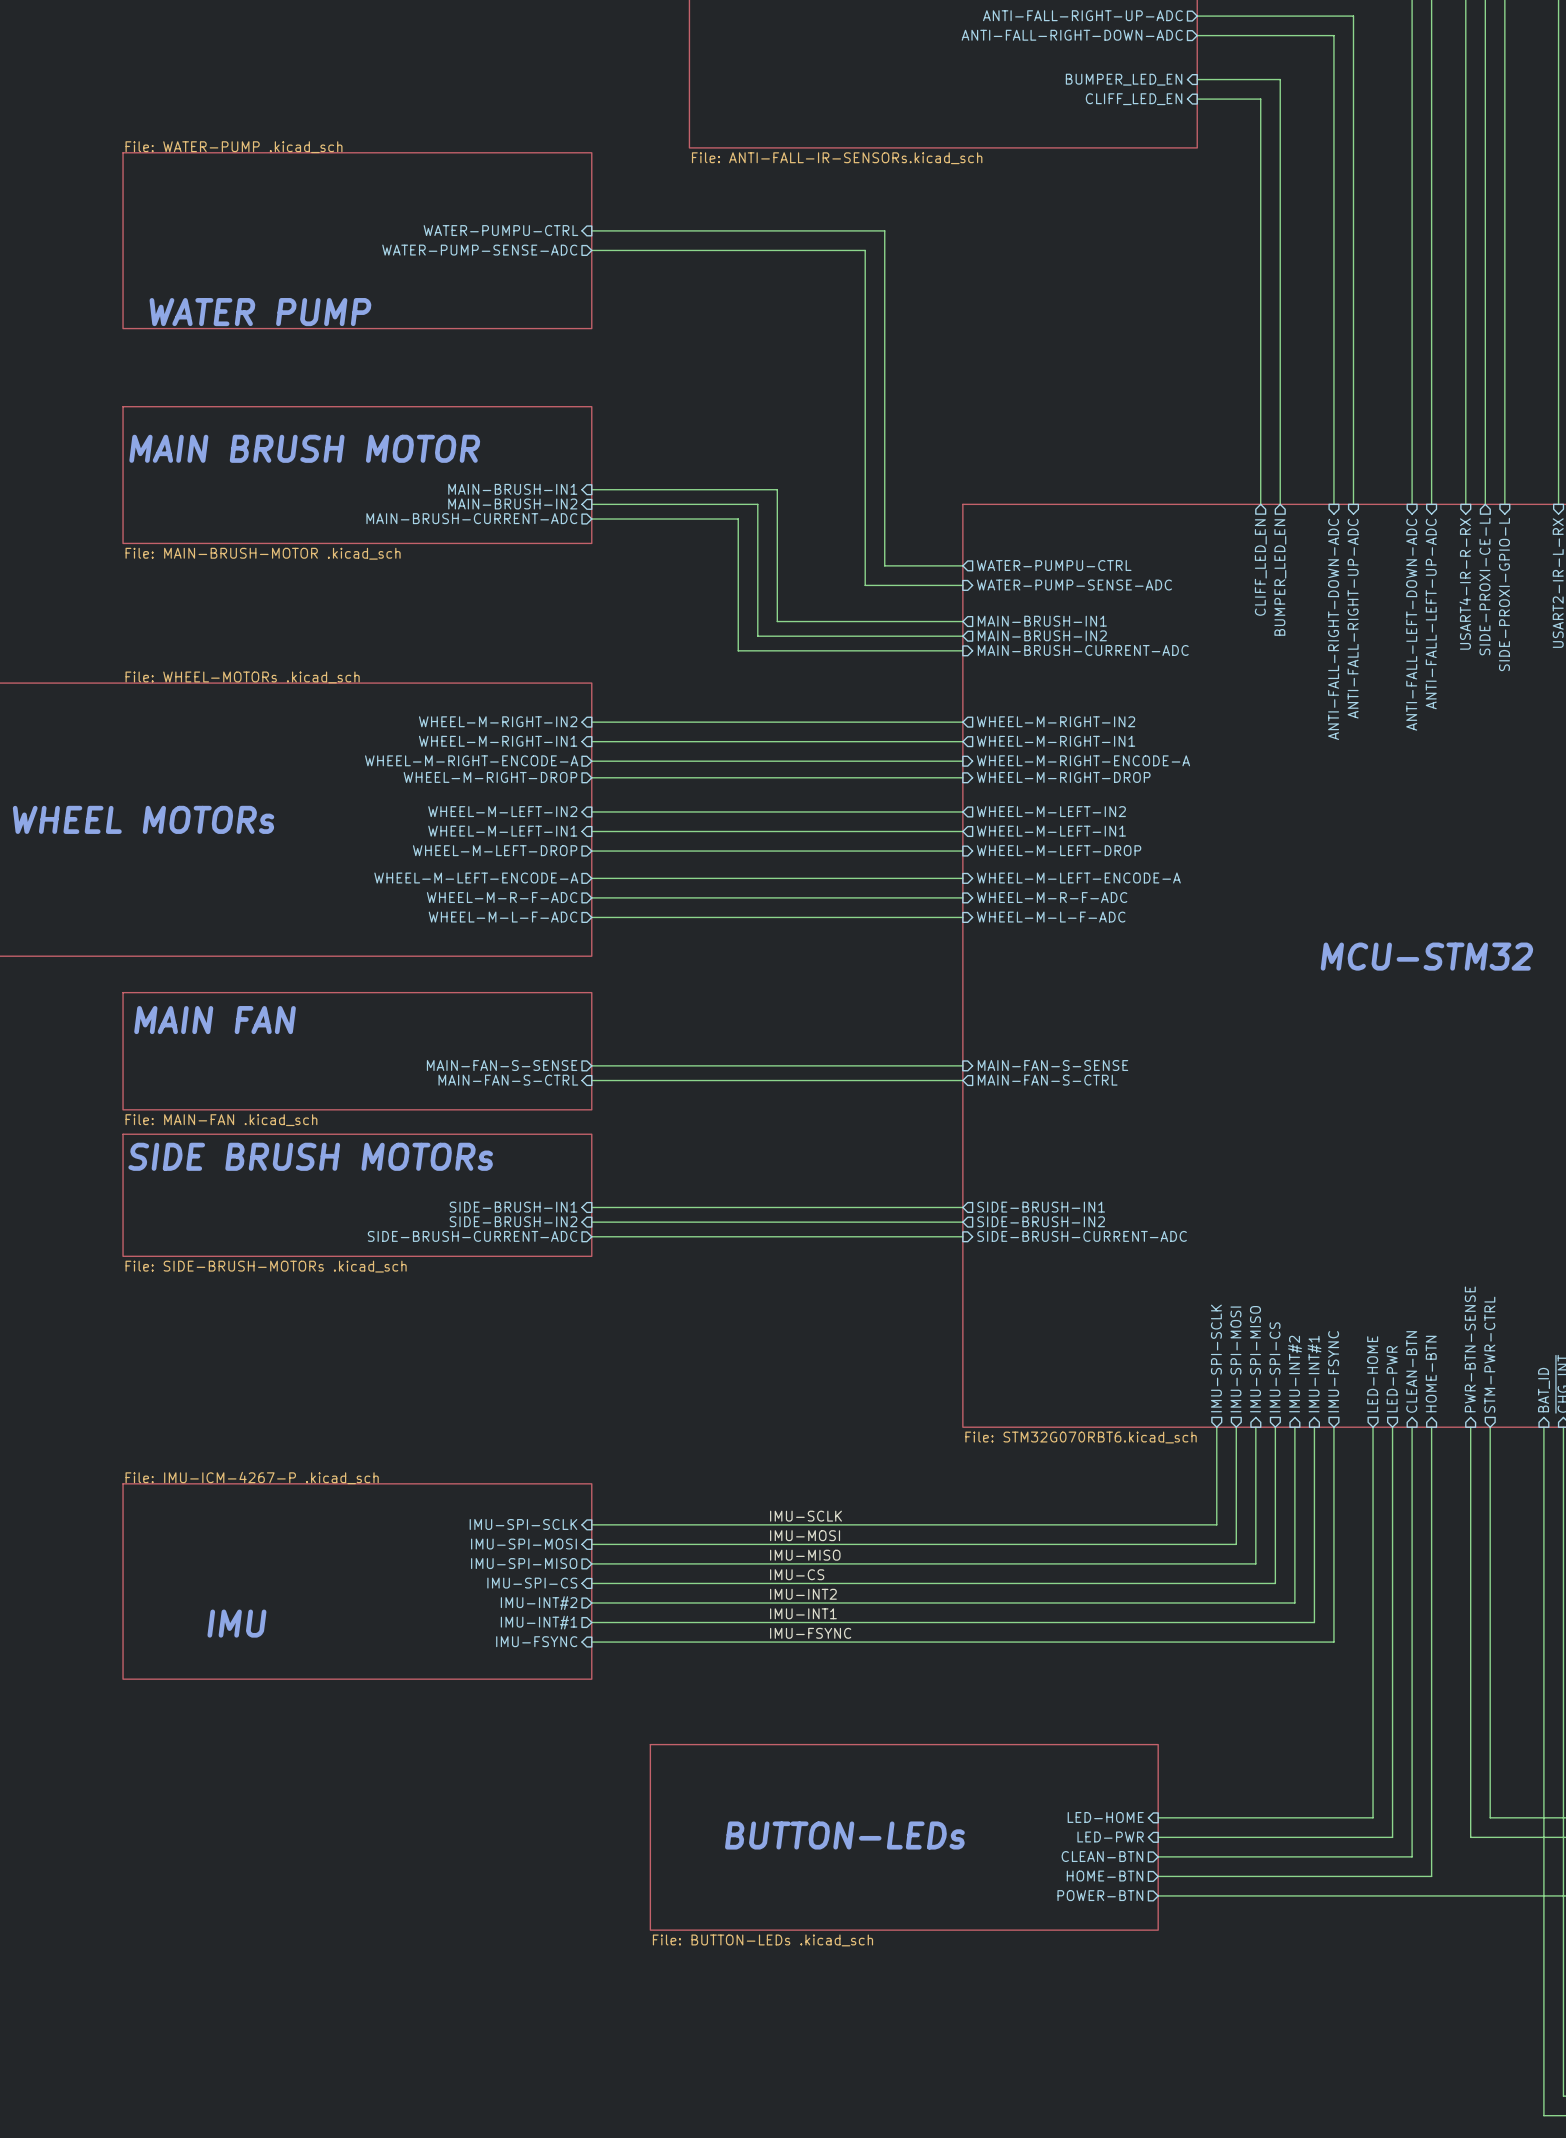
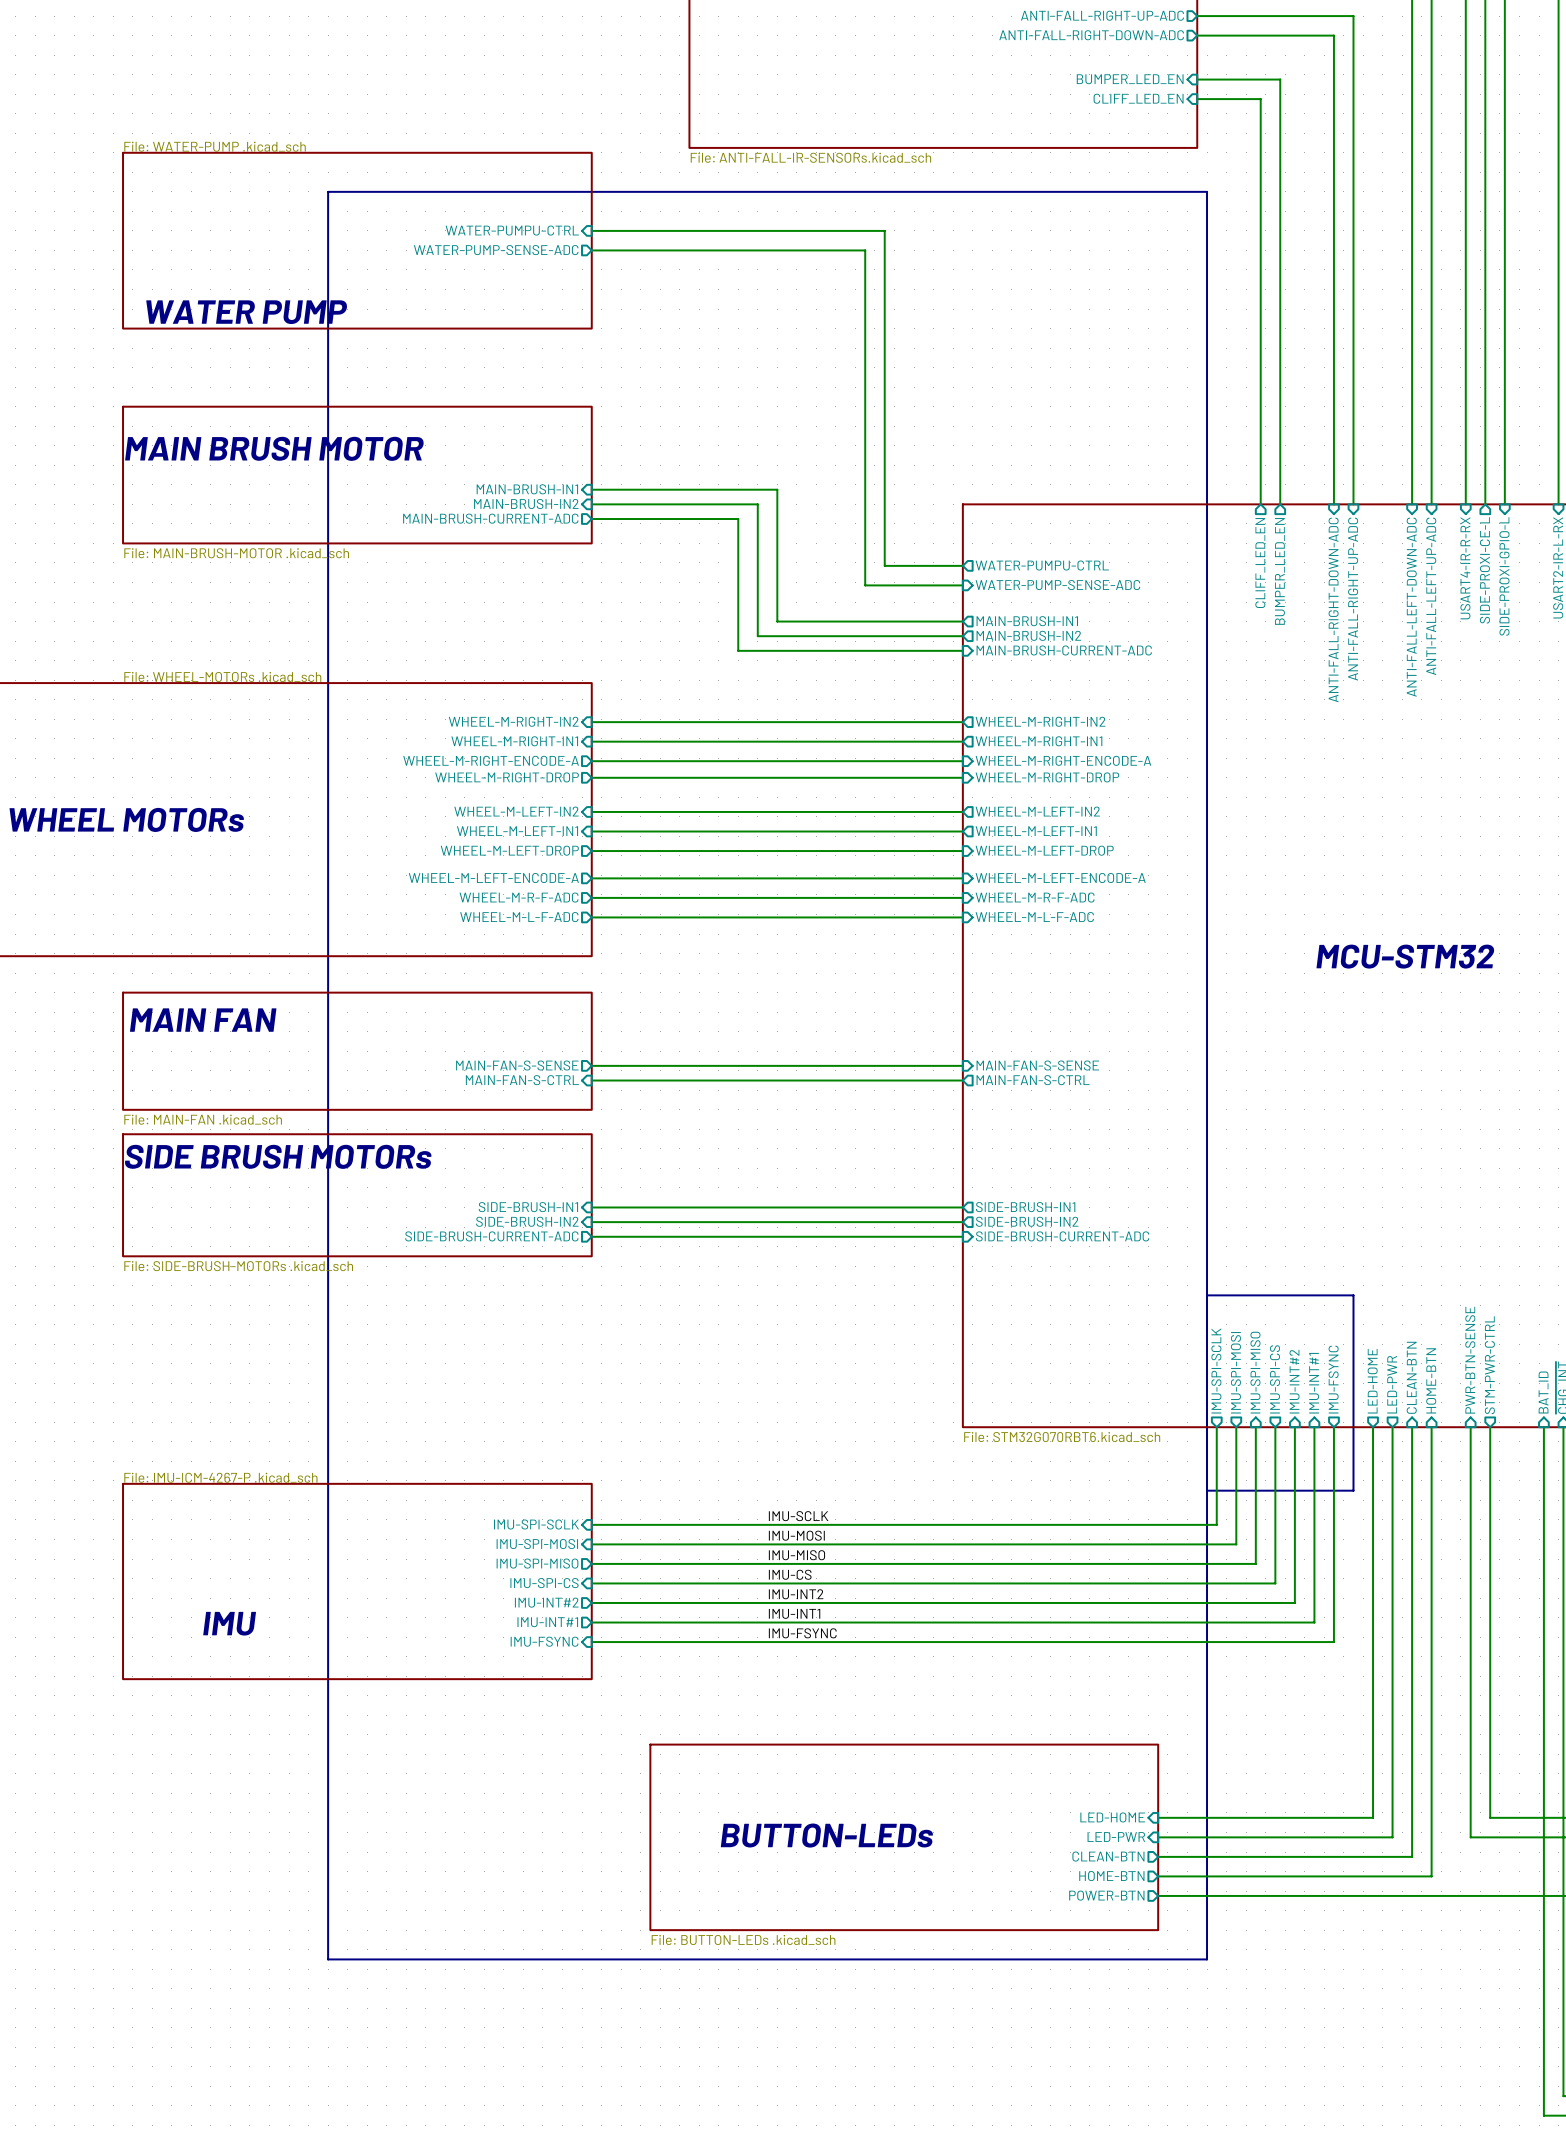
line: none -> (328, 191) (1207, 191) (1207, 1959) (328, 1959) (328, 191)
line: none -> (1207, 1295) (1353, 1295) (1353, 1490) (1207, 1490)

